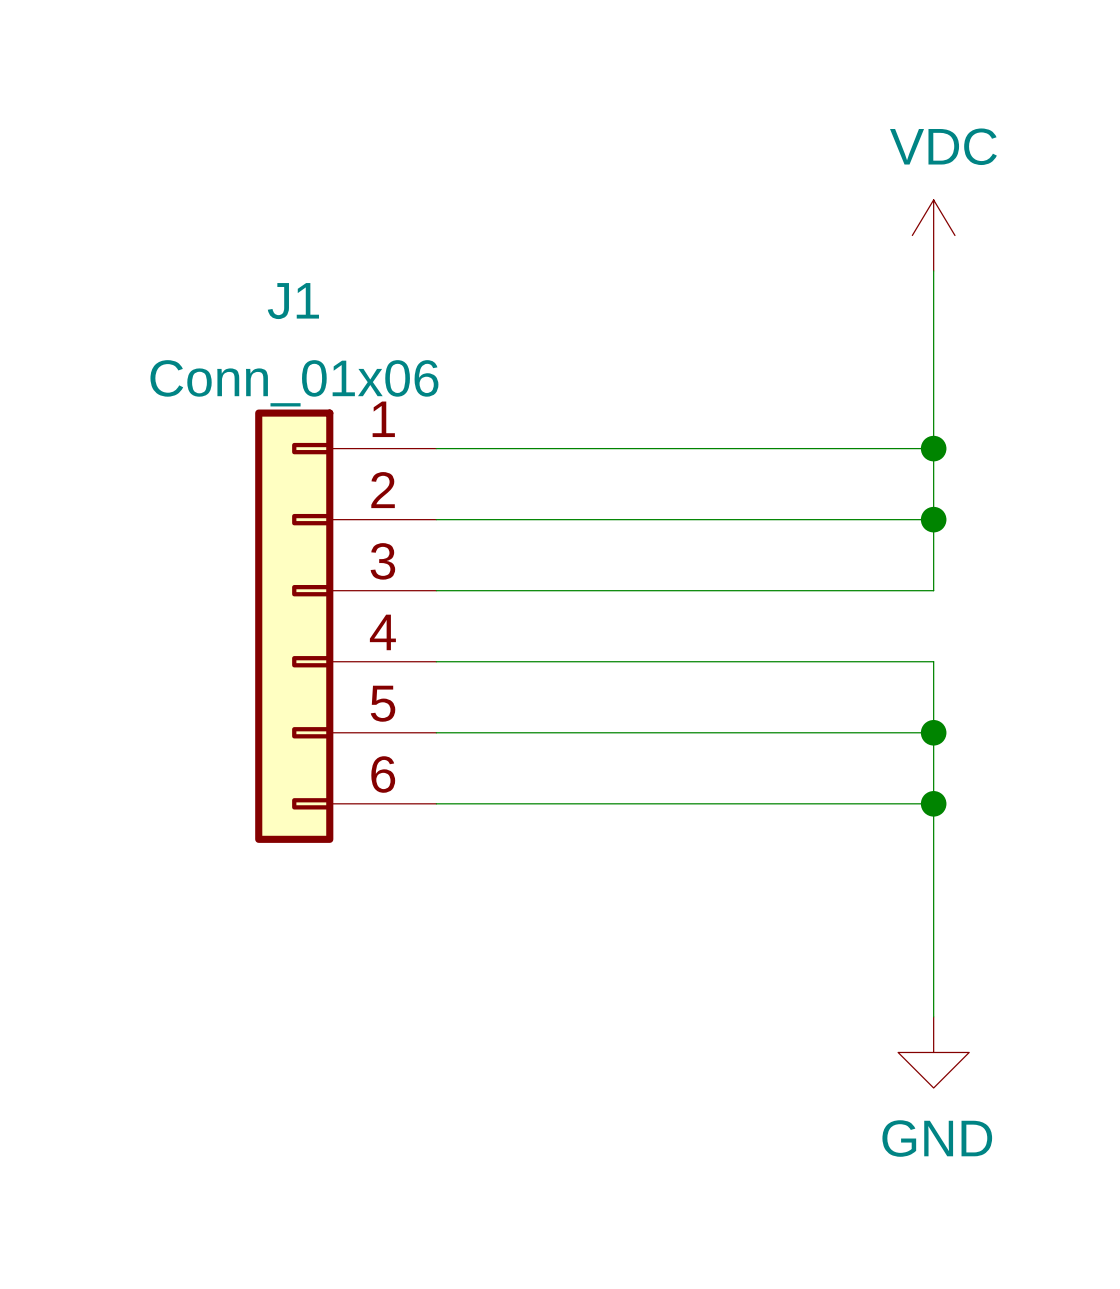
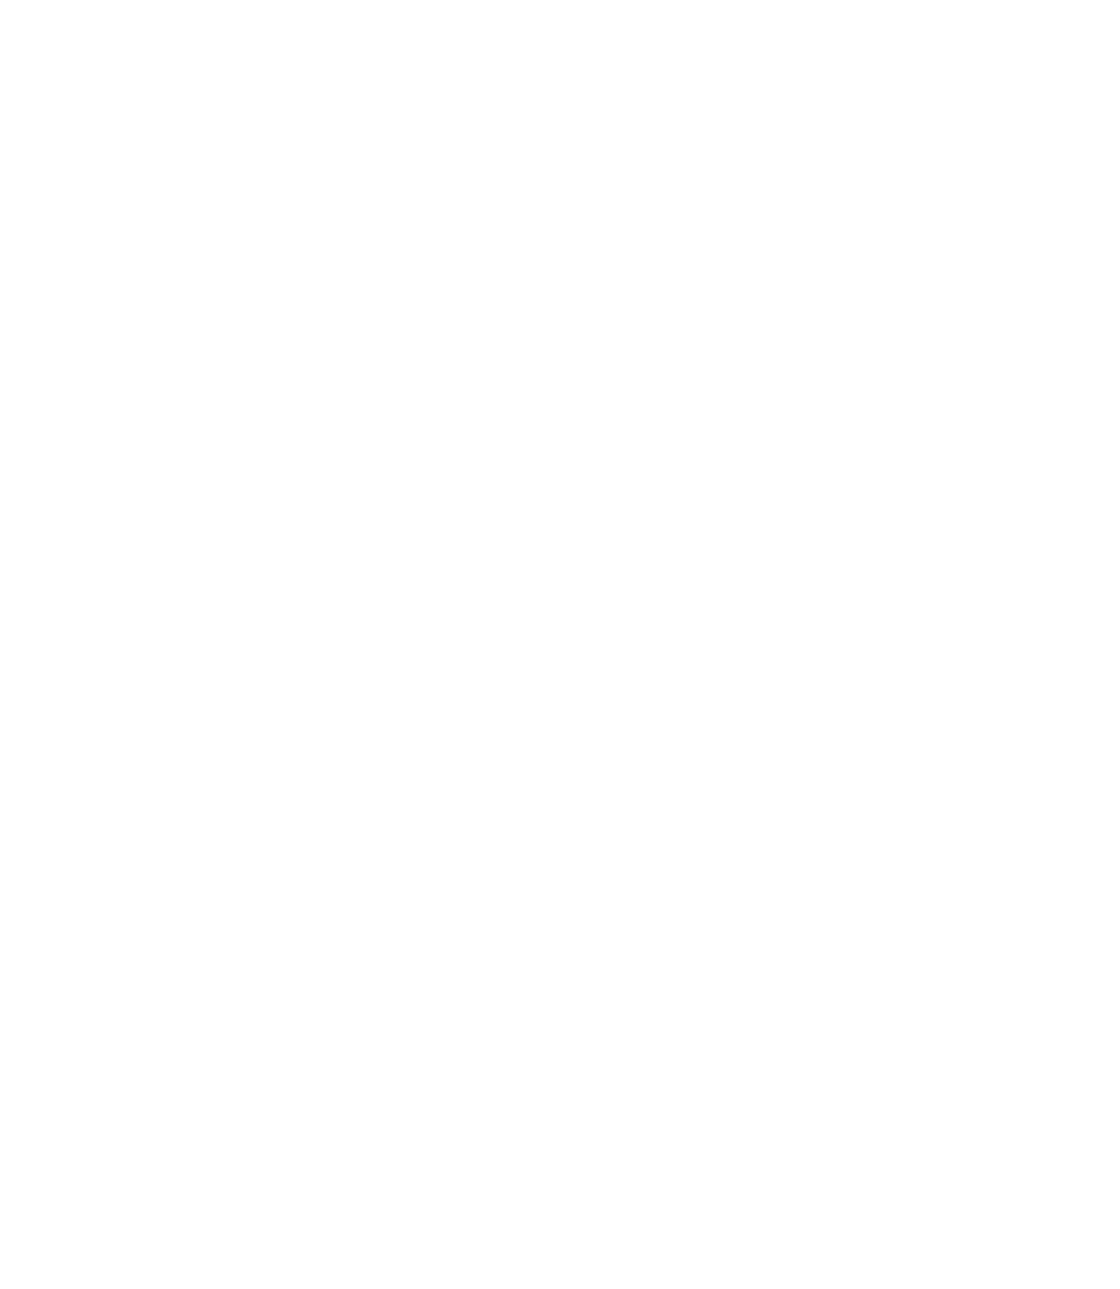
power symbol: VDC (933, 235) -> none
wire: (933, 270) (933, 590) (436, 590) -> none
wire: (436, 448) (933, 448) -> none
junction: (933, 448) -> none
wire: (436, 519) (933, 519) -> none
junction: (933, 519) -> none
J1: Conn_01x06 (345, 626) -> none
wire: (436, 661) (933, 661) (933, 1016) -> none
wire: (436, 732) (933, 732) -> none
junction: (933, 732) -> none
wire: (436, 803) (933, 803) -> none
junction: (933, 803) -> none
power symbol: GND (933, 1052) -> none

